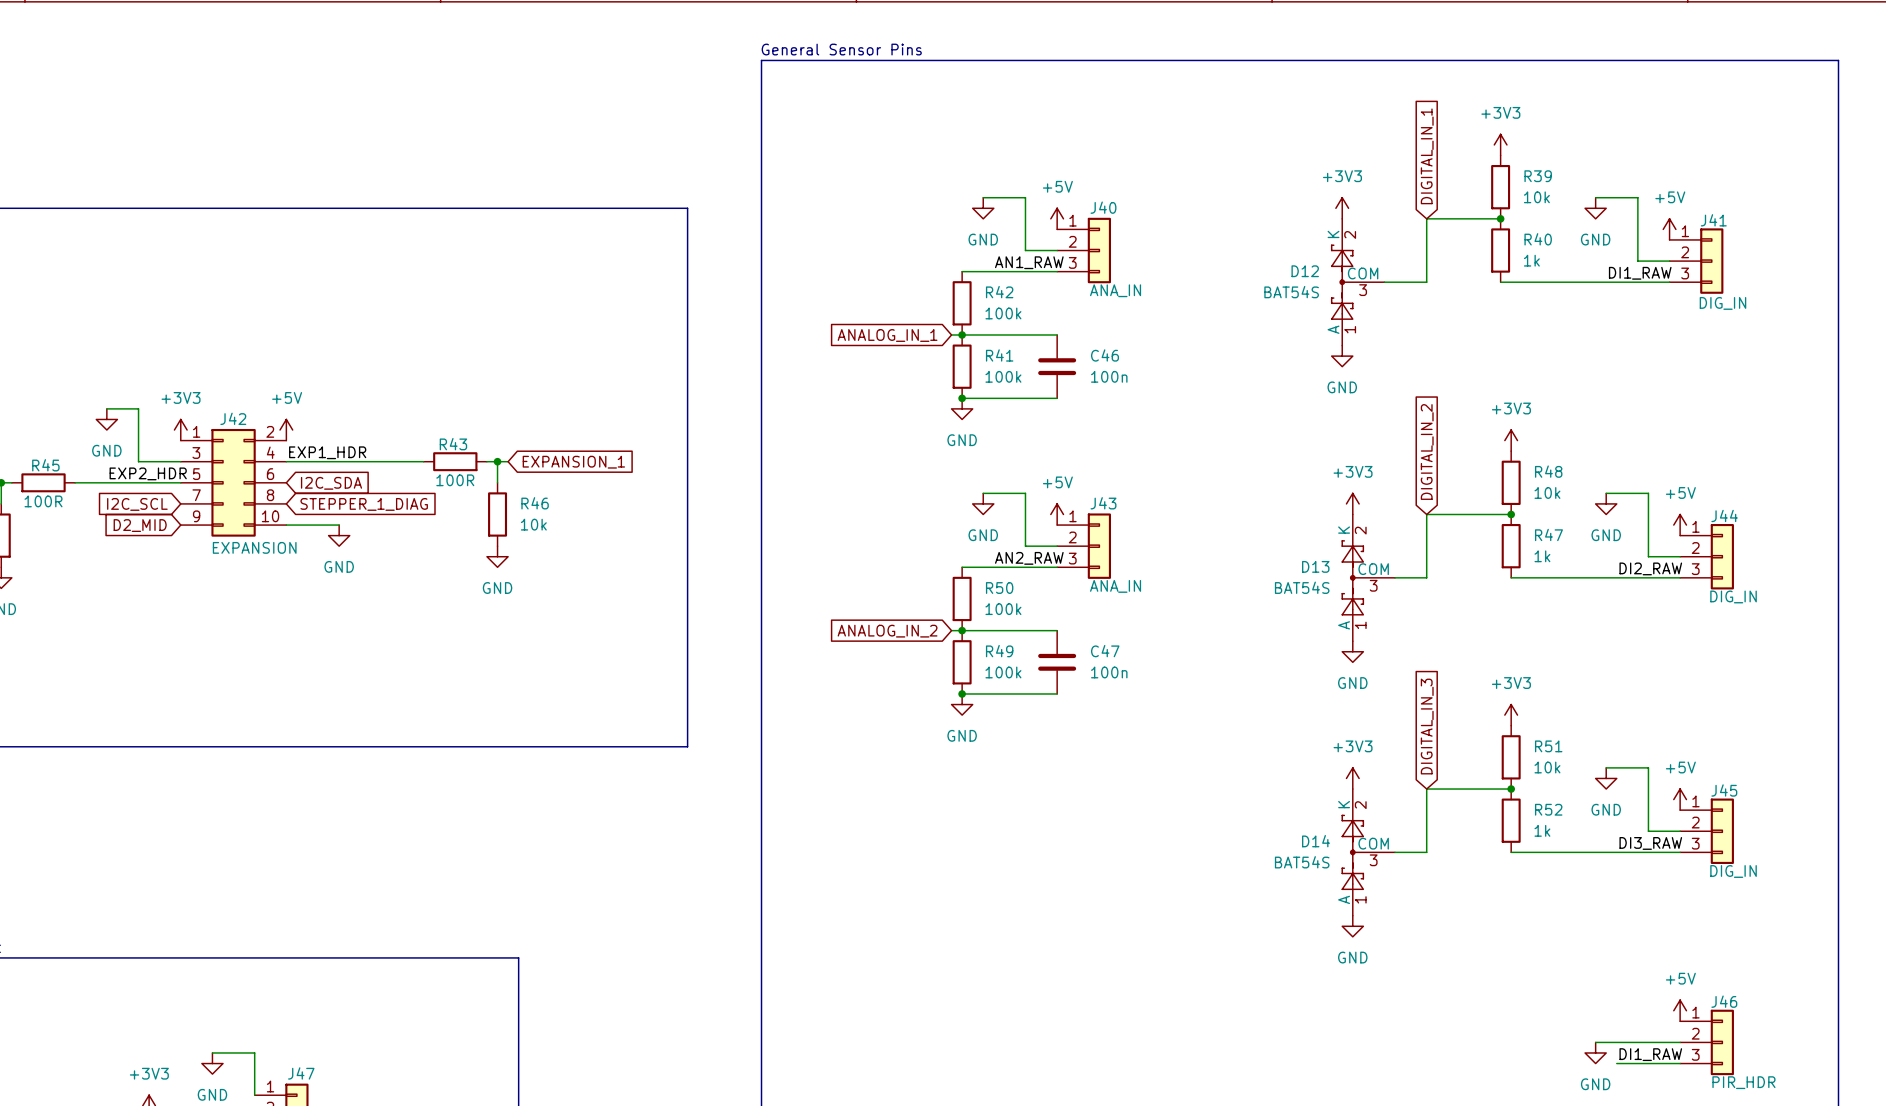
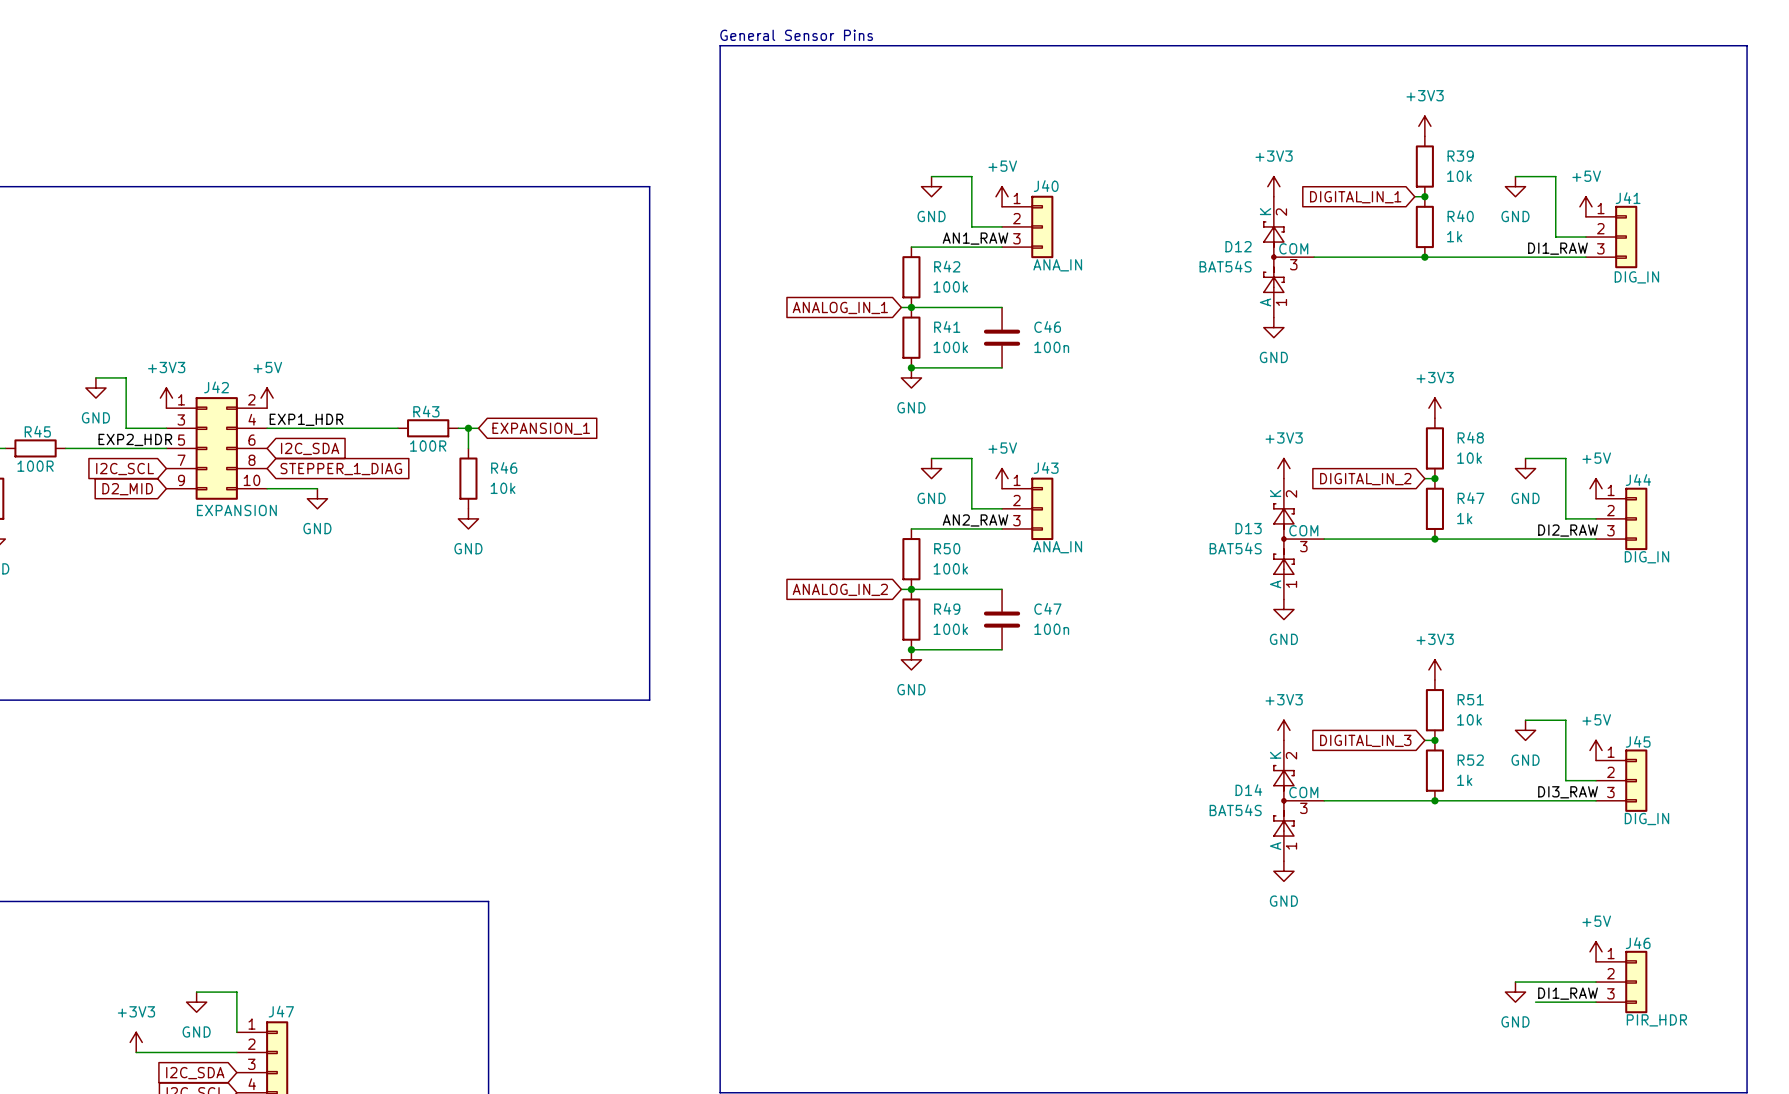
global label rotation: 0° (1427, 156) -> 90° counterclockwise (1355, 197)
wire: (1490, 218) (1426, 218) (1426, 282) -> (1424, 257) (1354, 257)
junction: none -> (1424, 257)
global label rotation: 0° (1427, 452) -> 90° counterclockwise (1365, 479)
wire: (1500, 514) (1426, 514) (1426, 577) -> (1434, 539) (1354, 539)
junction: none -> (1434, 539)
global label rotation: 0° (1427, 726) -> 90° counterclockwise (1365, 740)
wire: (1500, 789) (1426, 789) (1426, 852) -> (1434, 800) (1354, 800)
junction: none -> (1434, 800)

